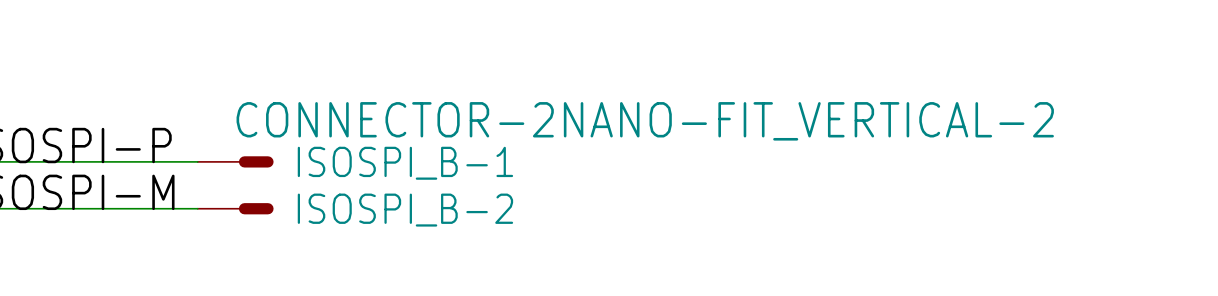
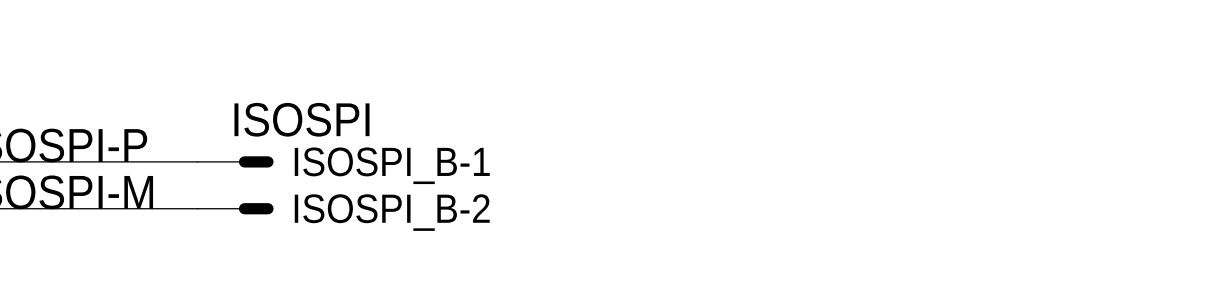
ISOSPI_B-1 value: CONNECTOR-2NANO-FIT_VERTICAL-2 (645, 121) -> ISOSPI (301, 119)

